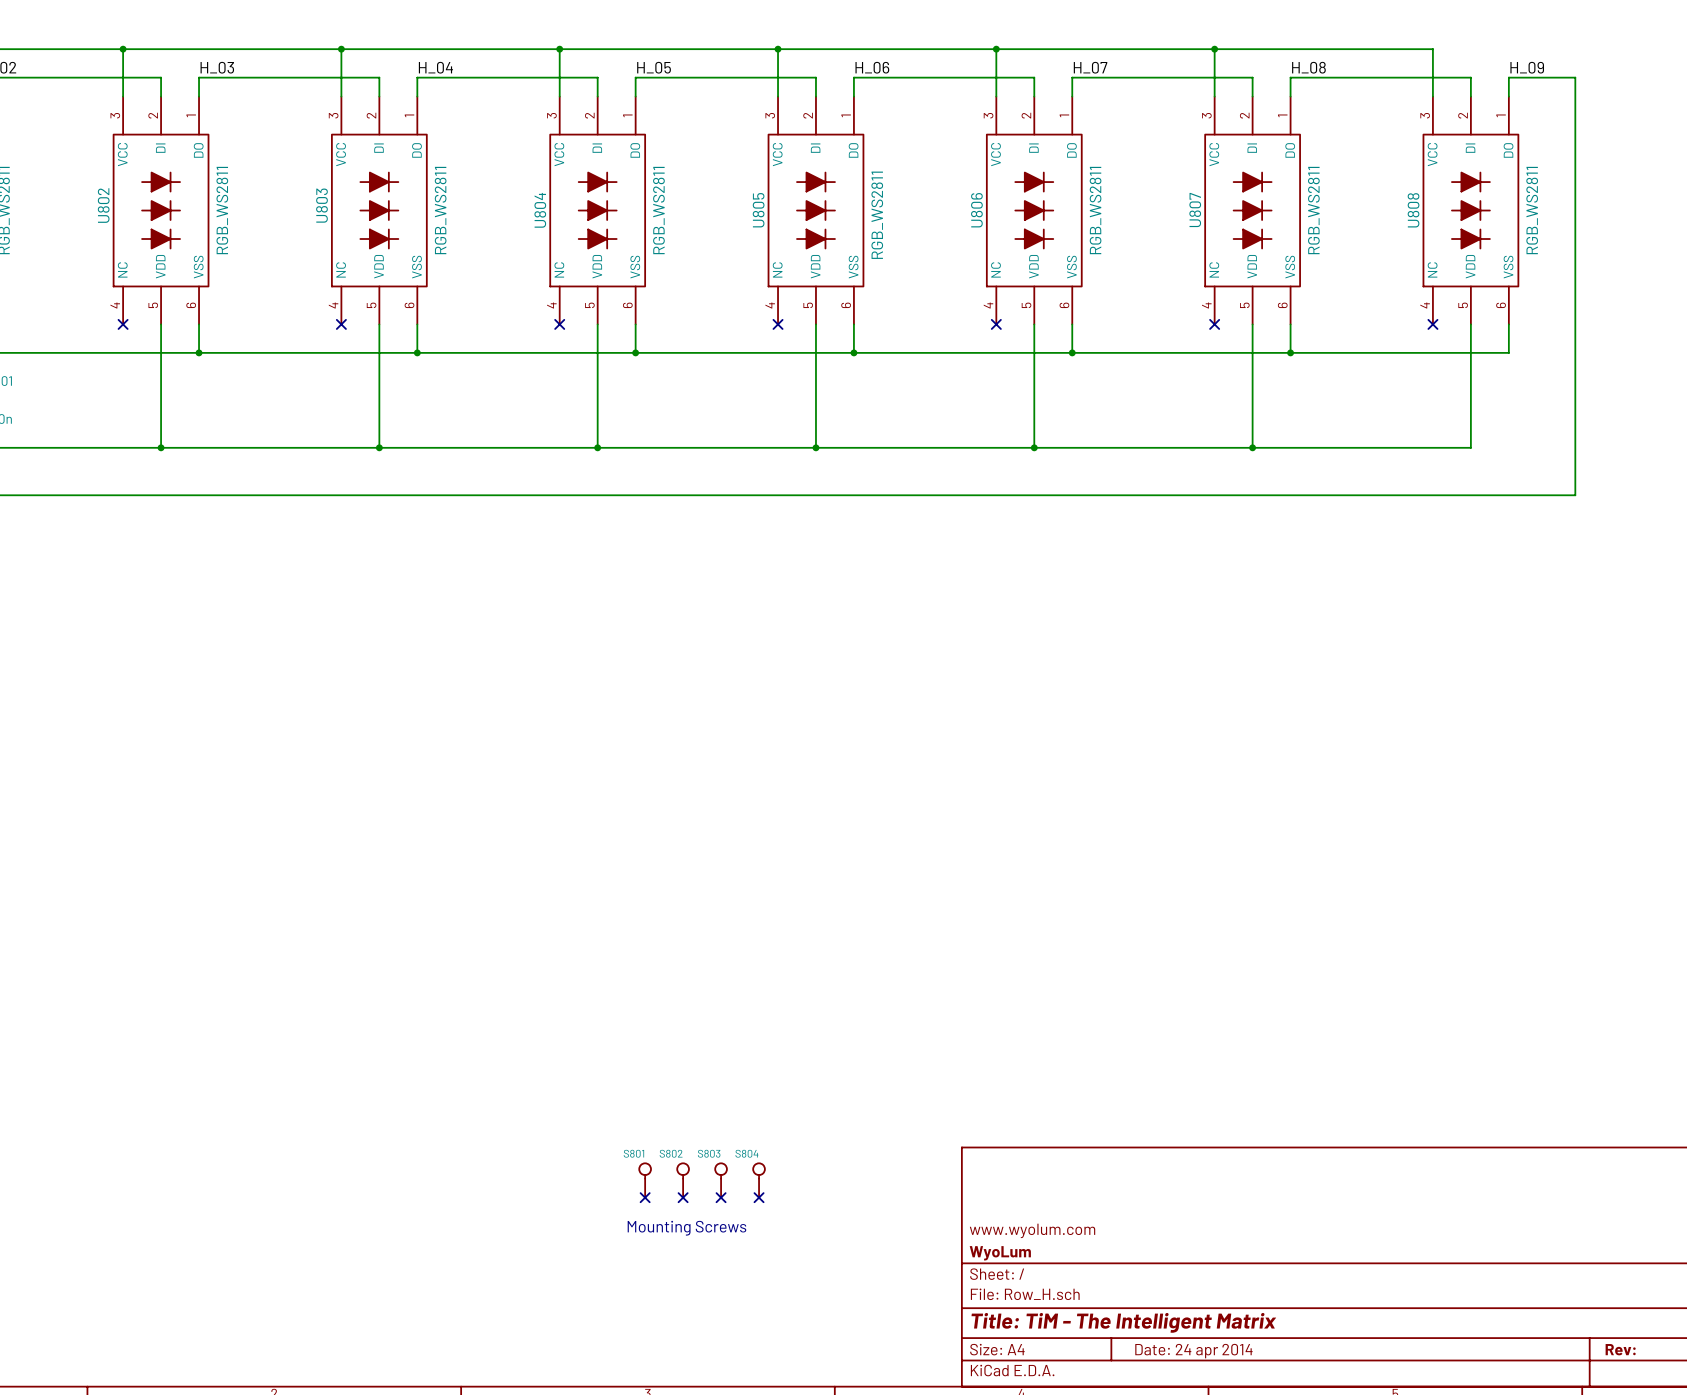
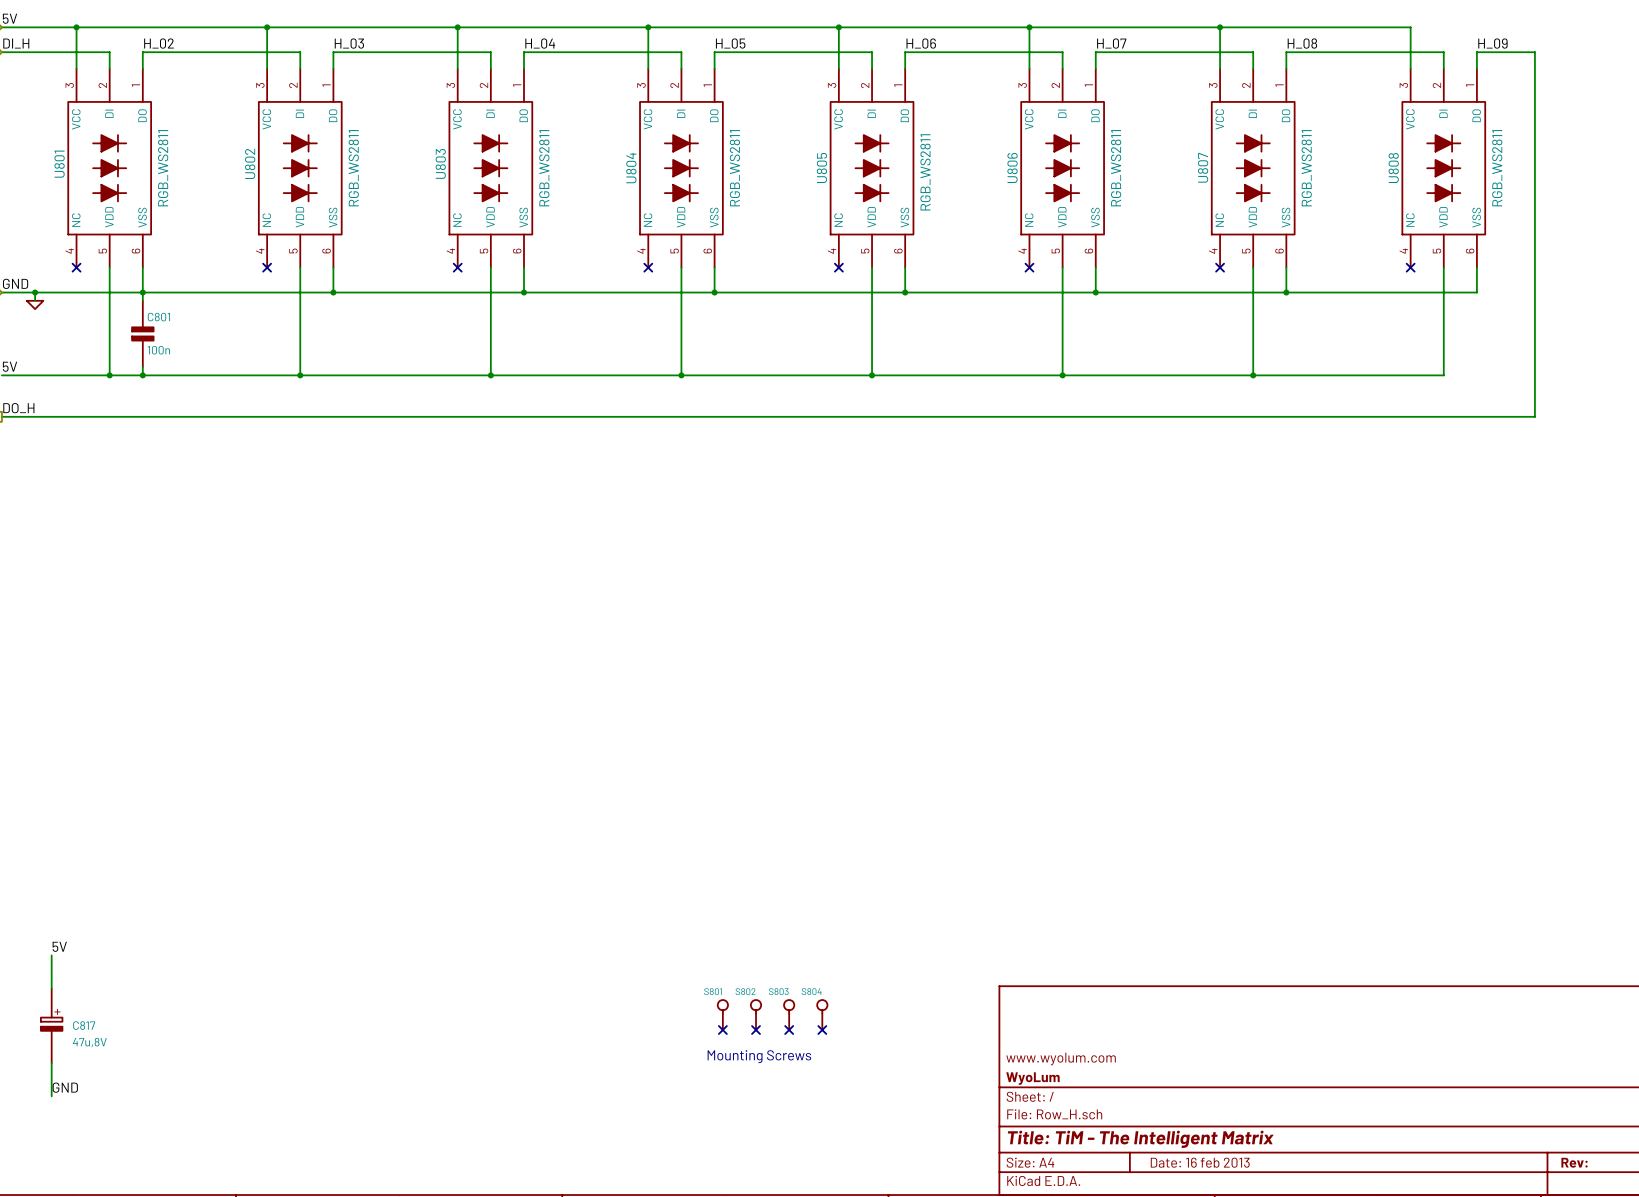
title block: Date: 24 apr 2014 (1193, 1351) -> Date: 16 feb 2013 (1200, 1162)

